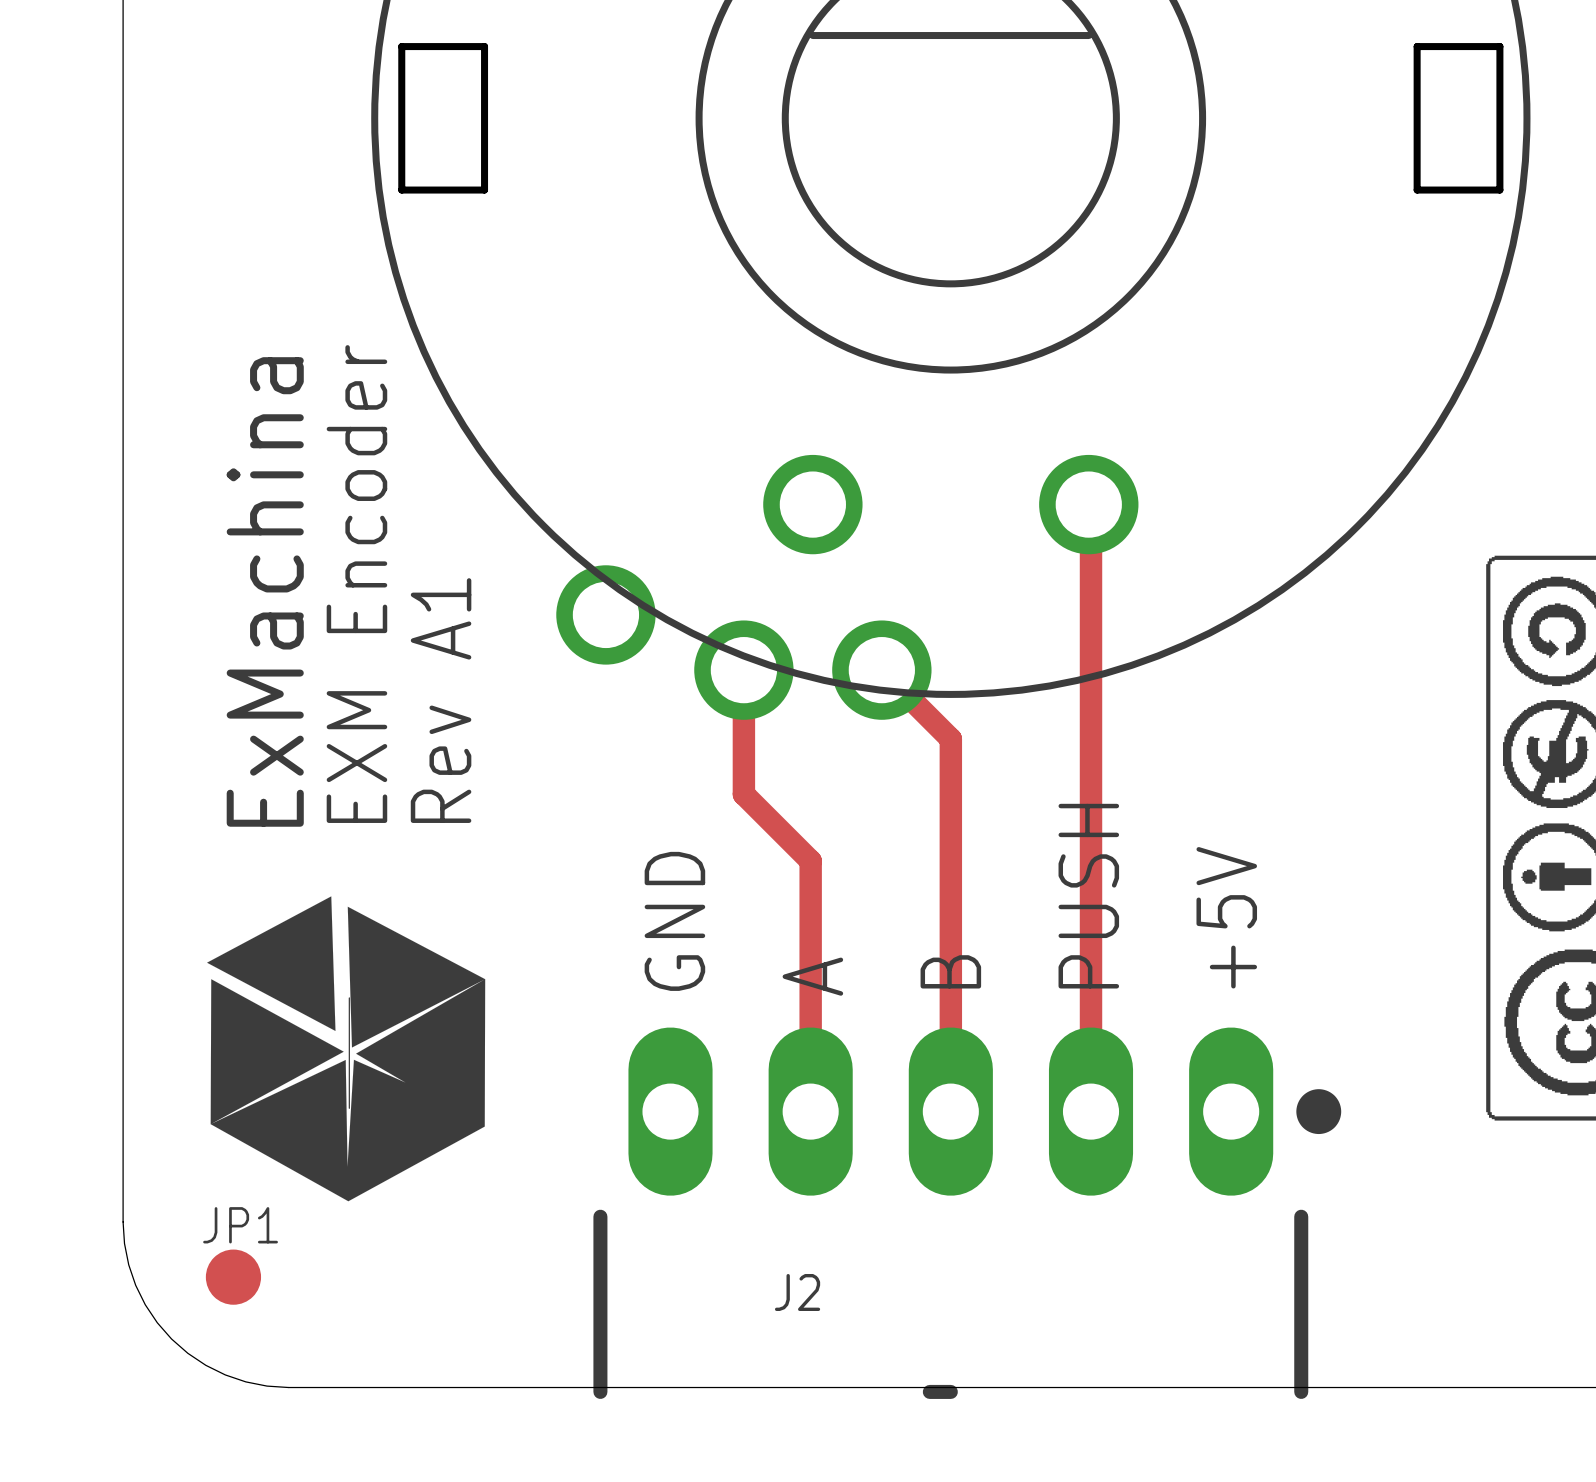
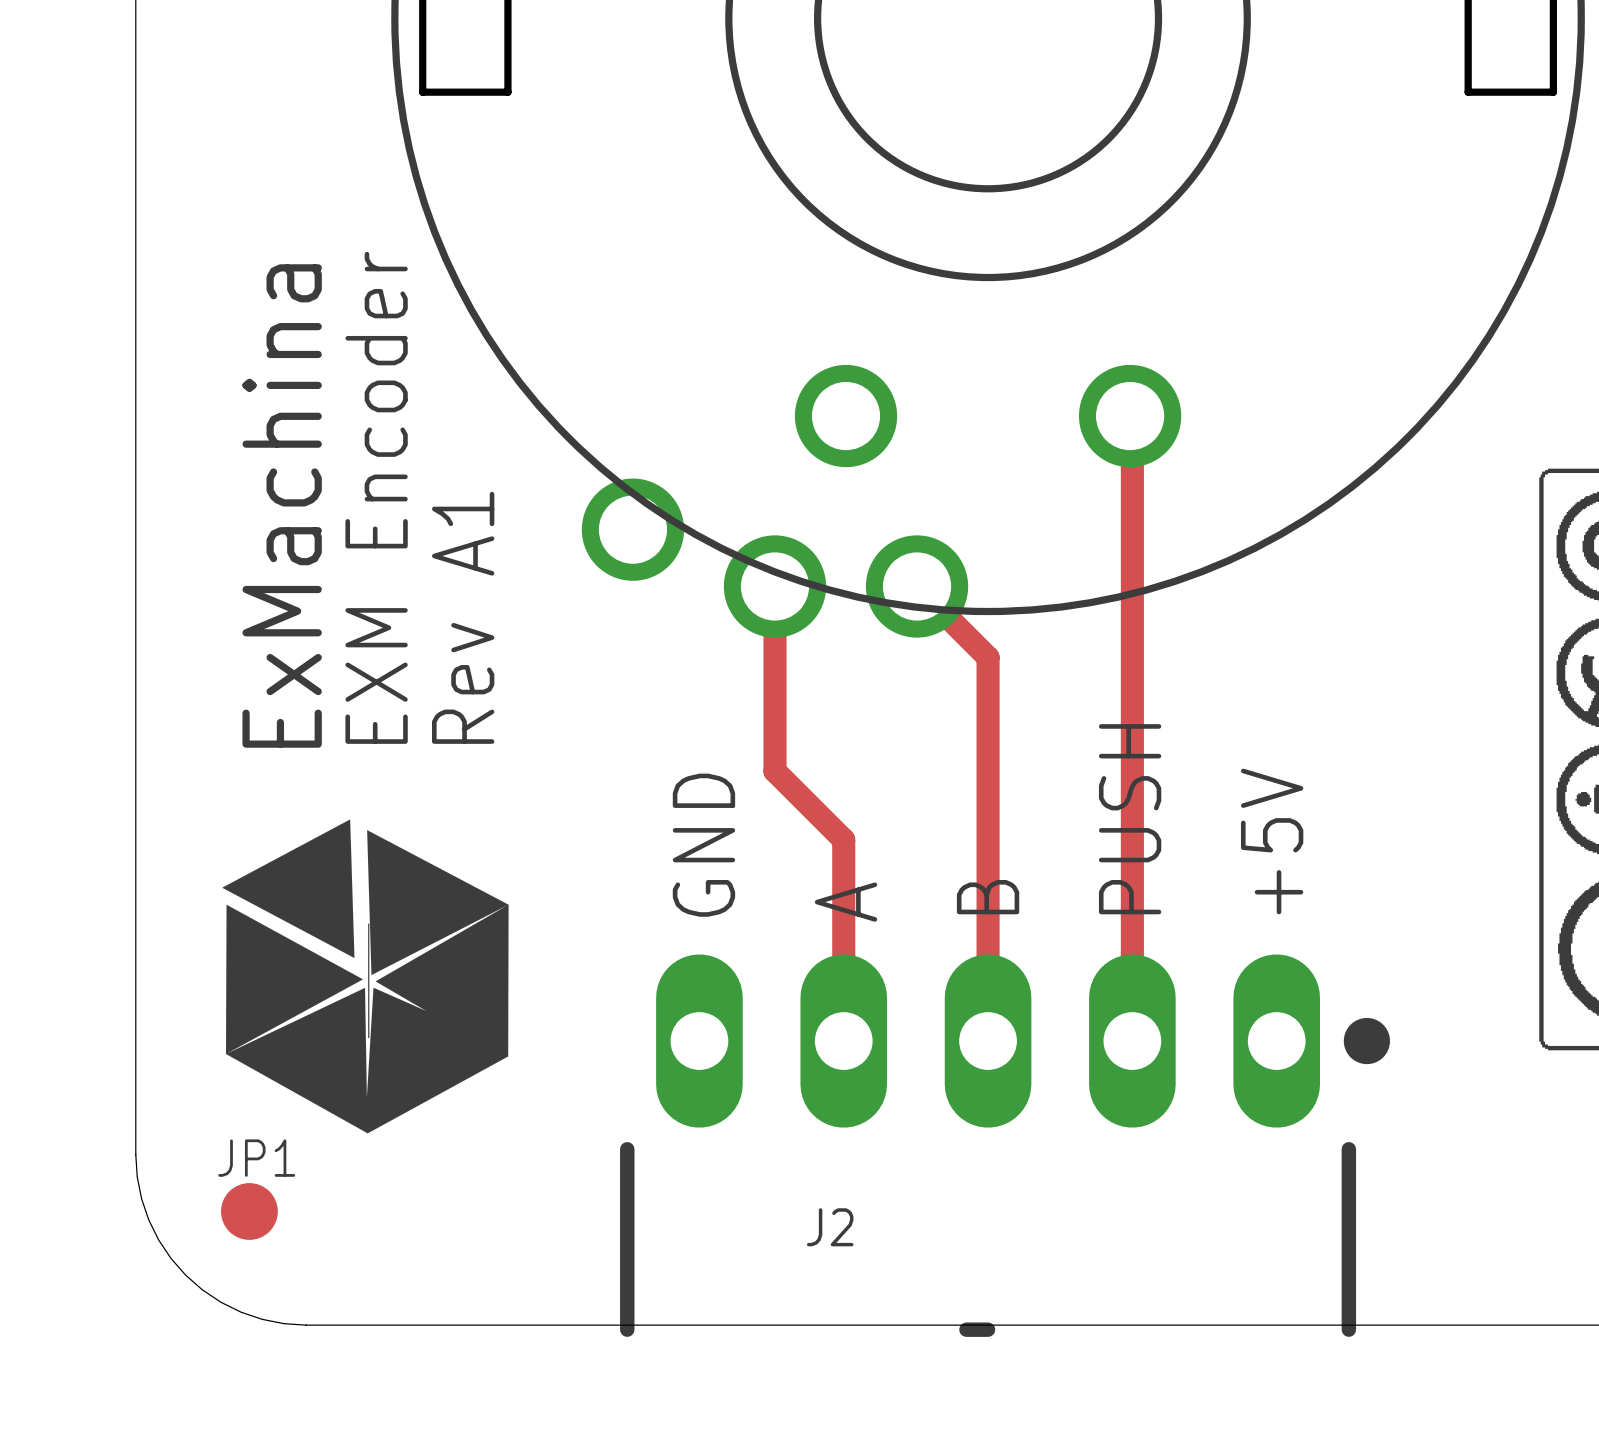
top track: (743, 794) (810, 861) (810, 916) -> (774, 714) (774, 771) (843, 839)

